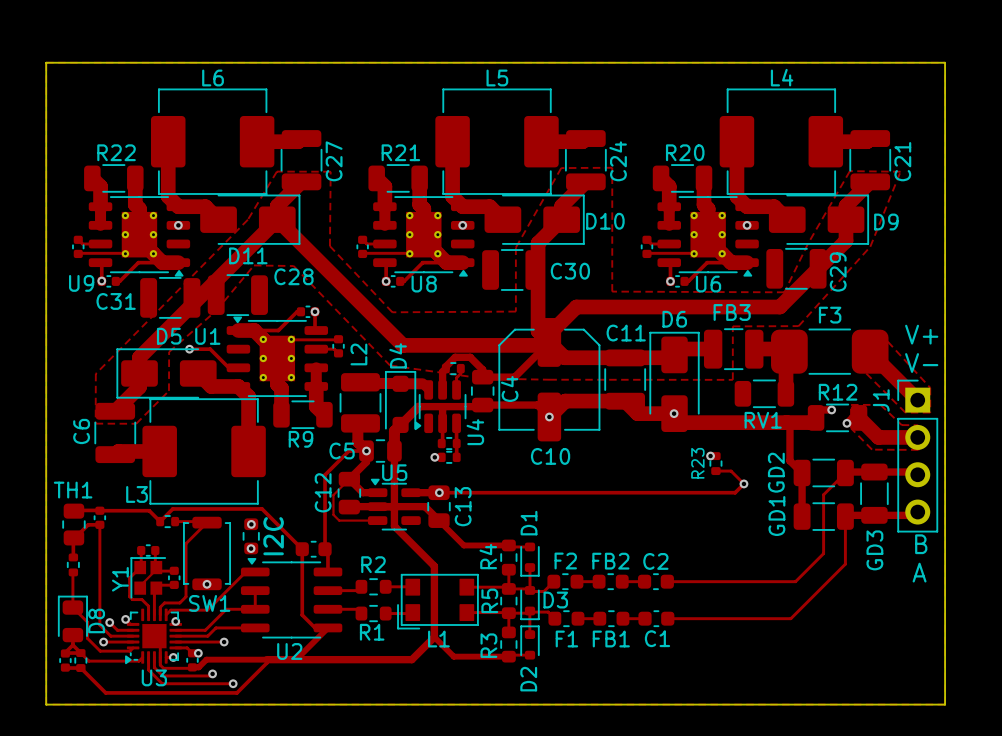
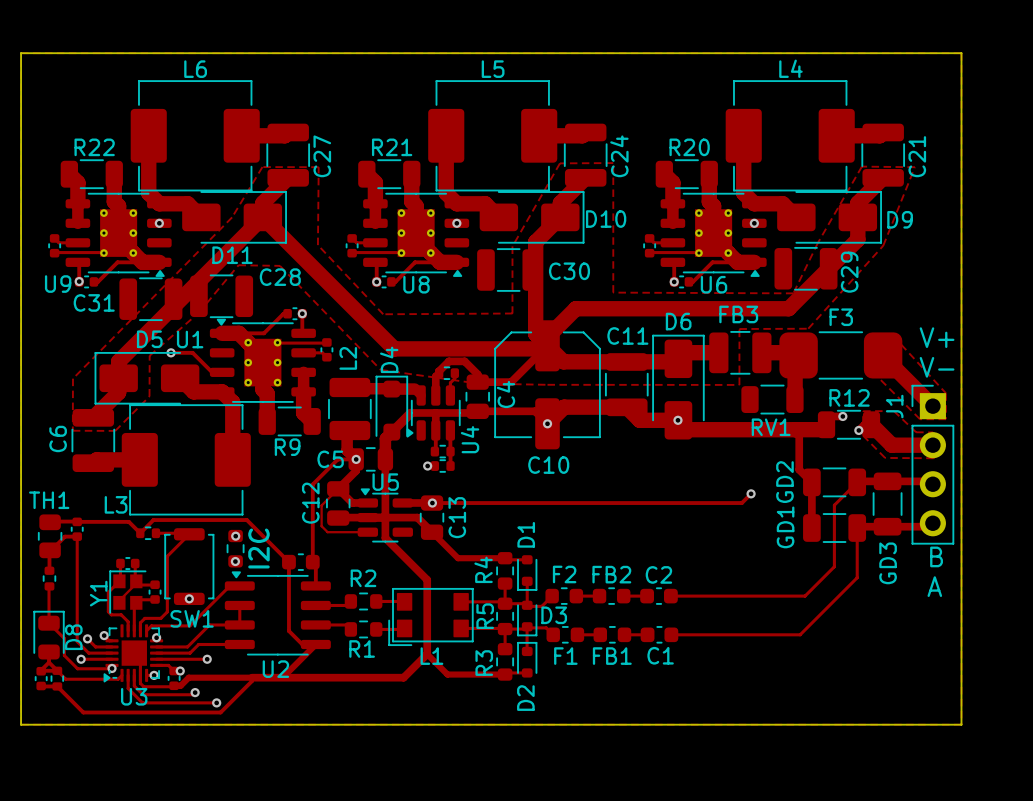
via: (710, 456) -> none
R23: (715, 463) -> none
track: (715, 471) (731, 471) (743, 483) -> none
via: none -> (112, 668)

